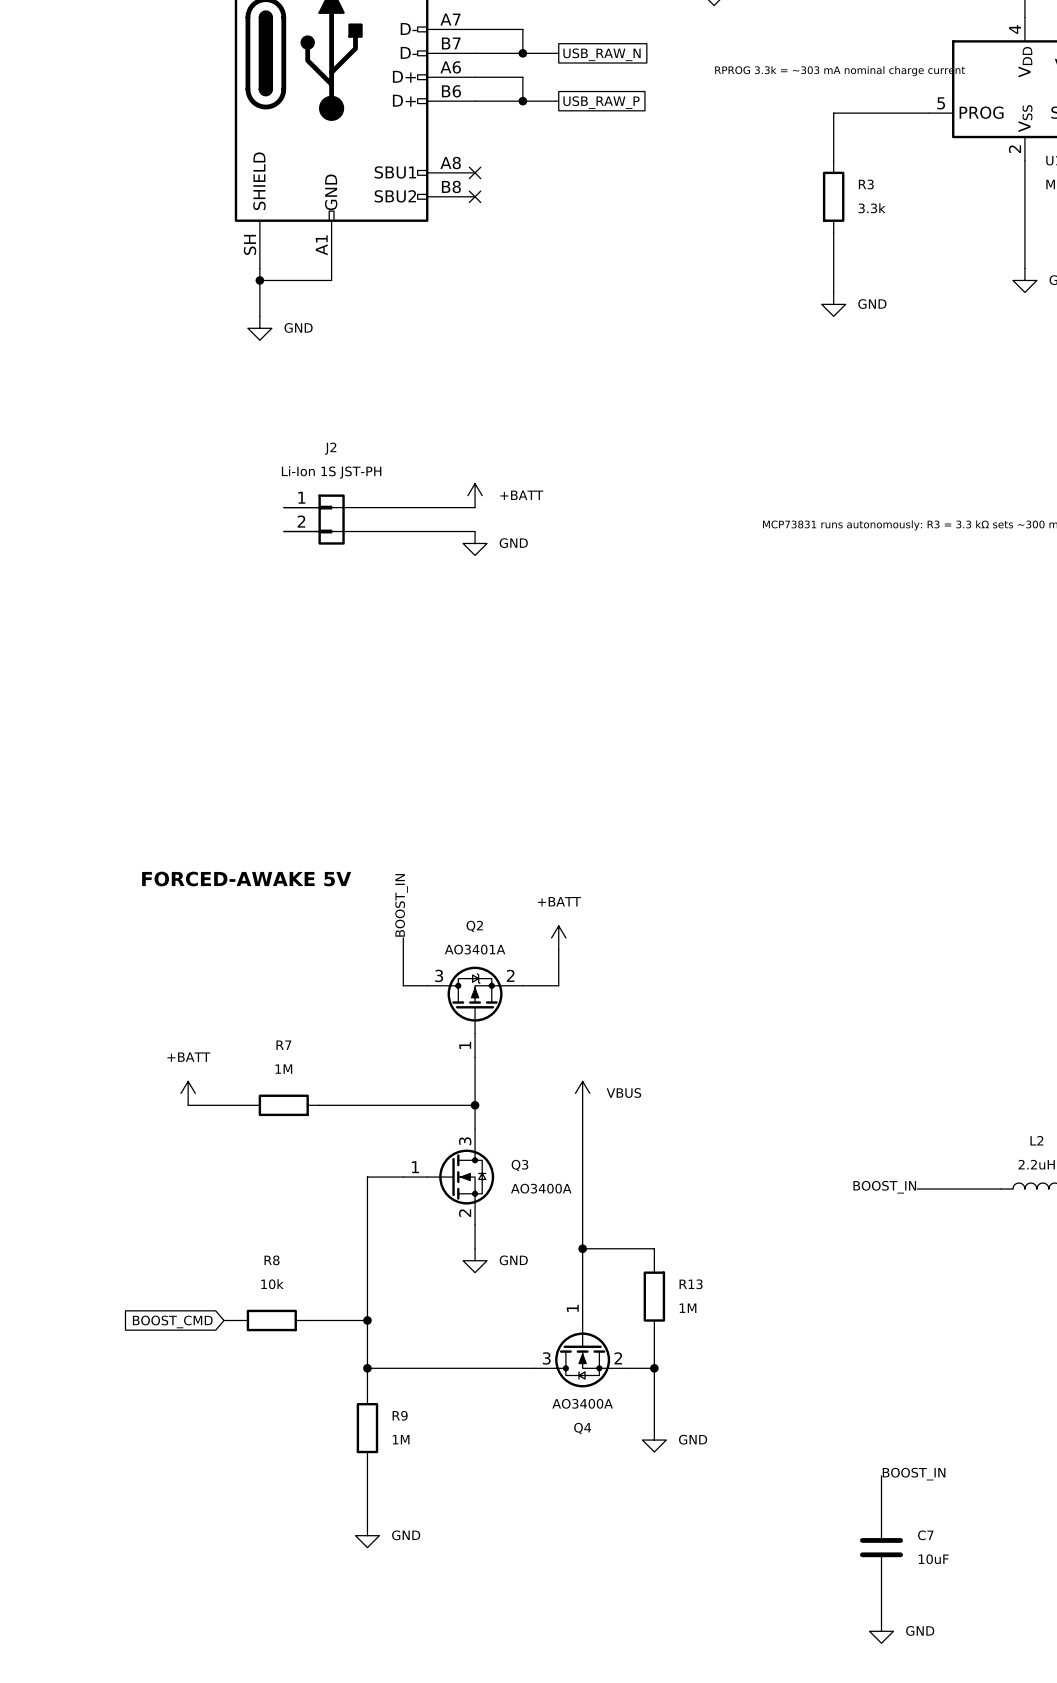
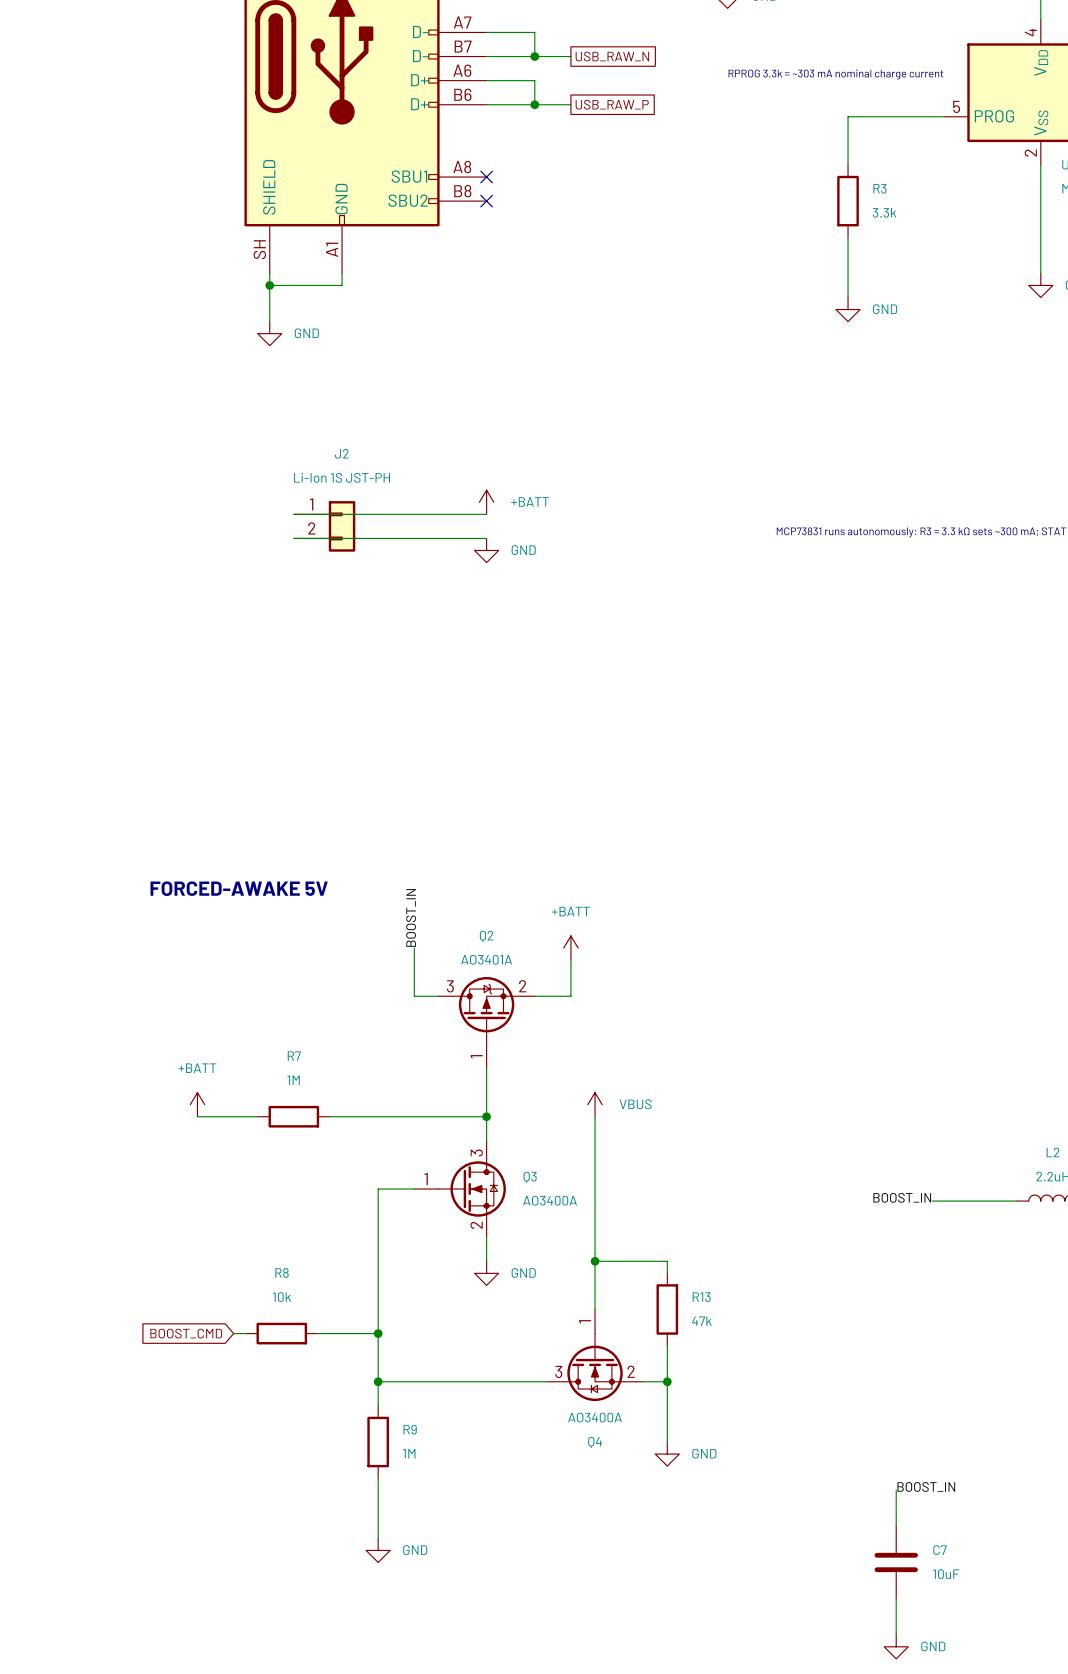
R13 value: 1M (688, 1308) -> 47k (701, 1321)

